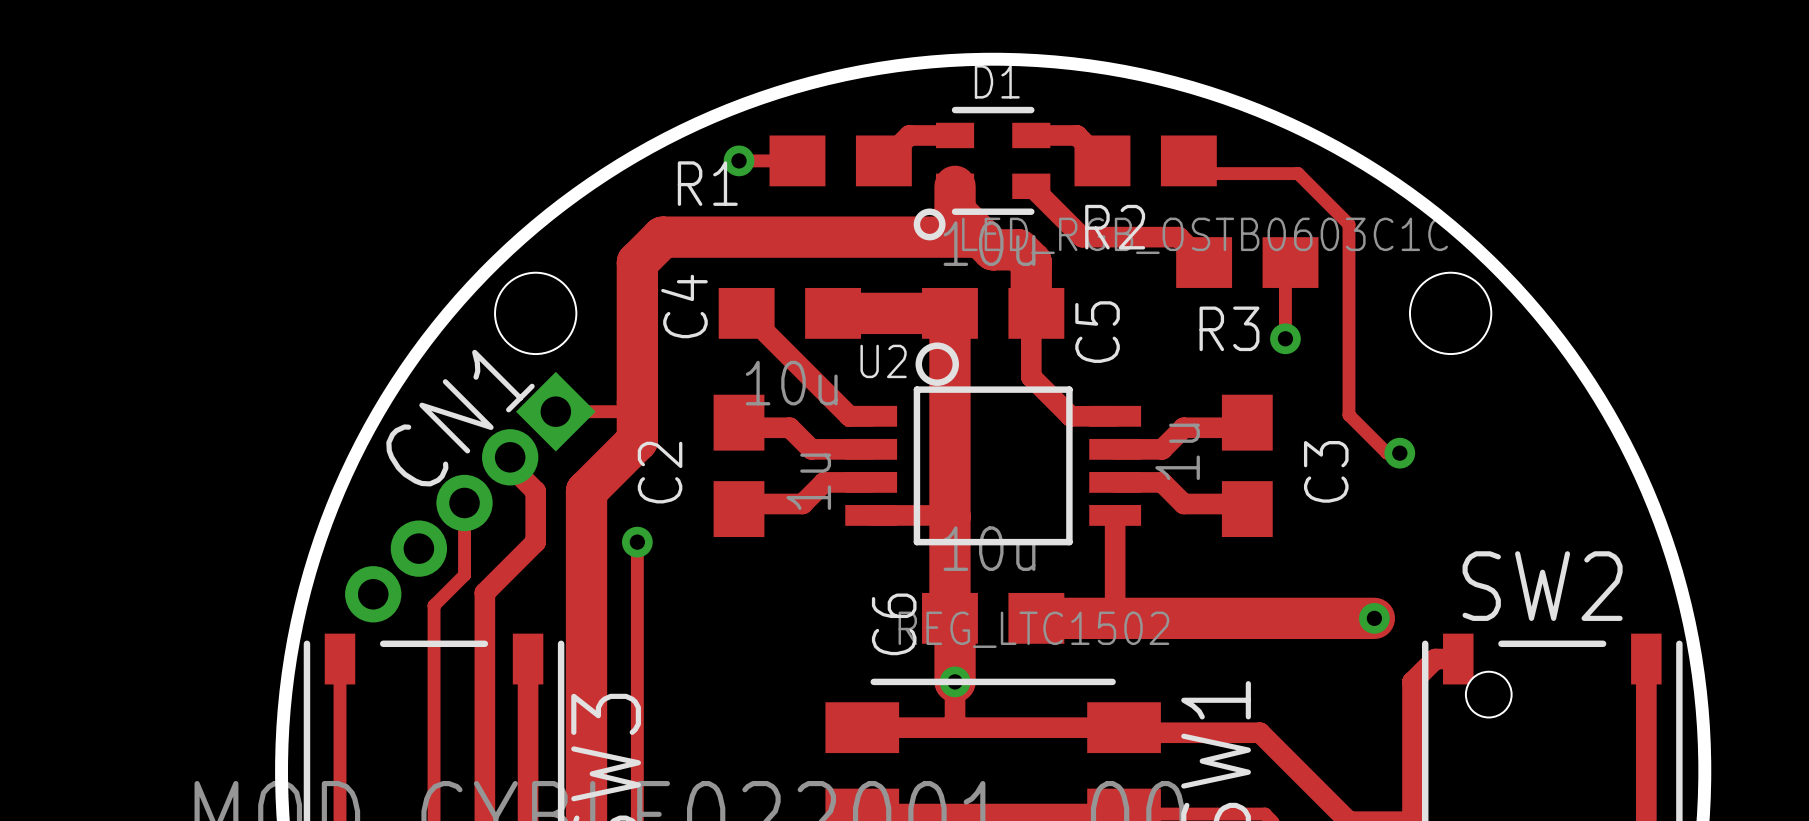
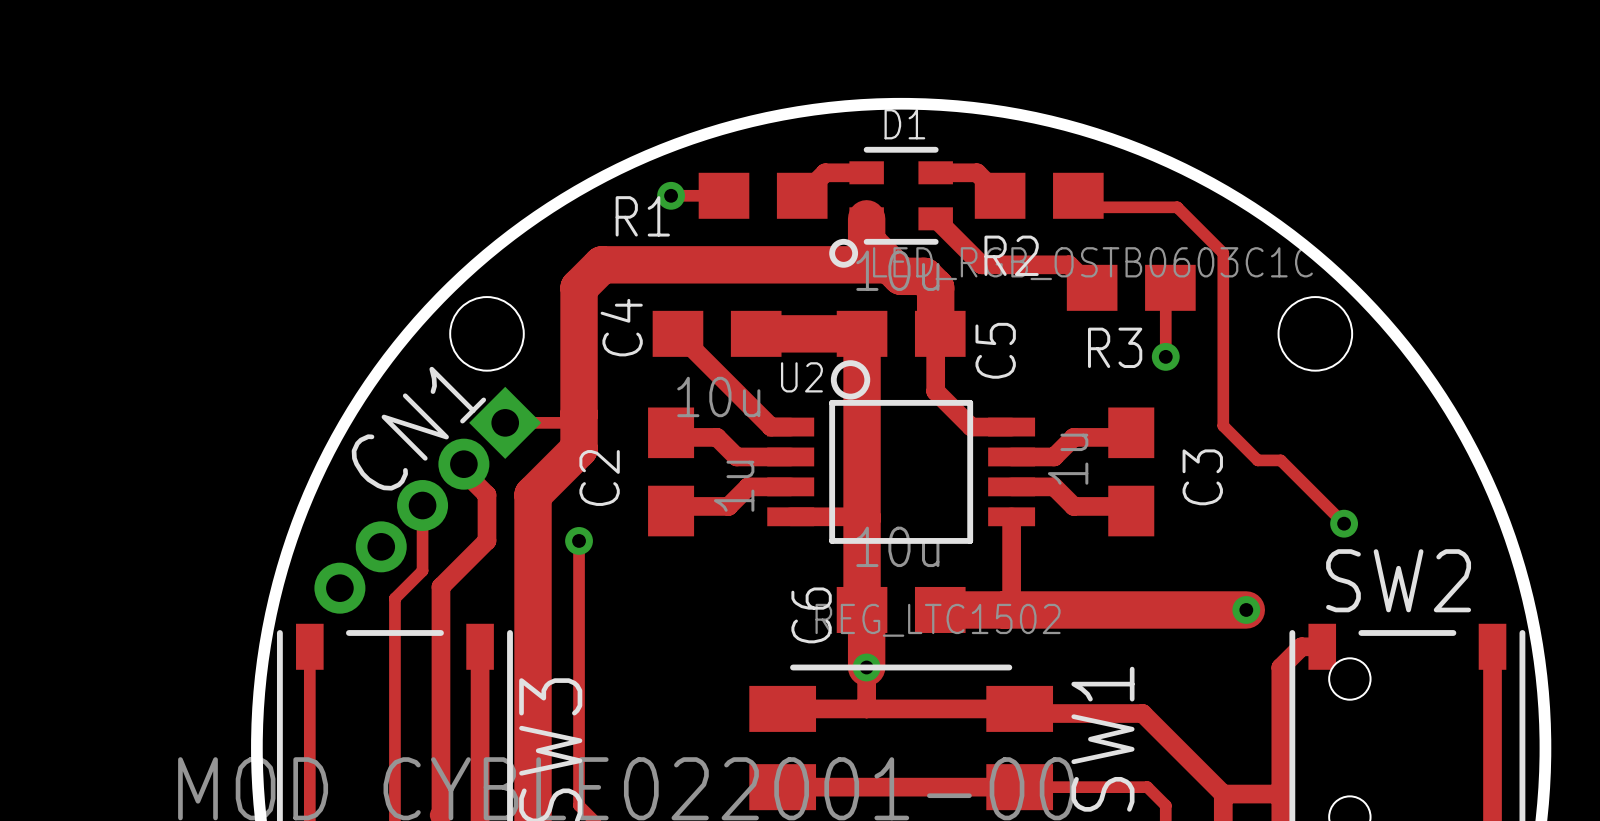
track: none -> (1269, 460) (1280, 460) (1344, 523)
via position: (1399, 453) -> (1344, 523)

